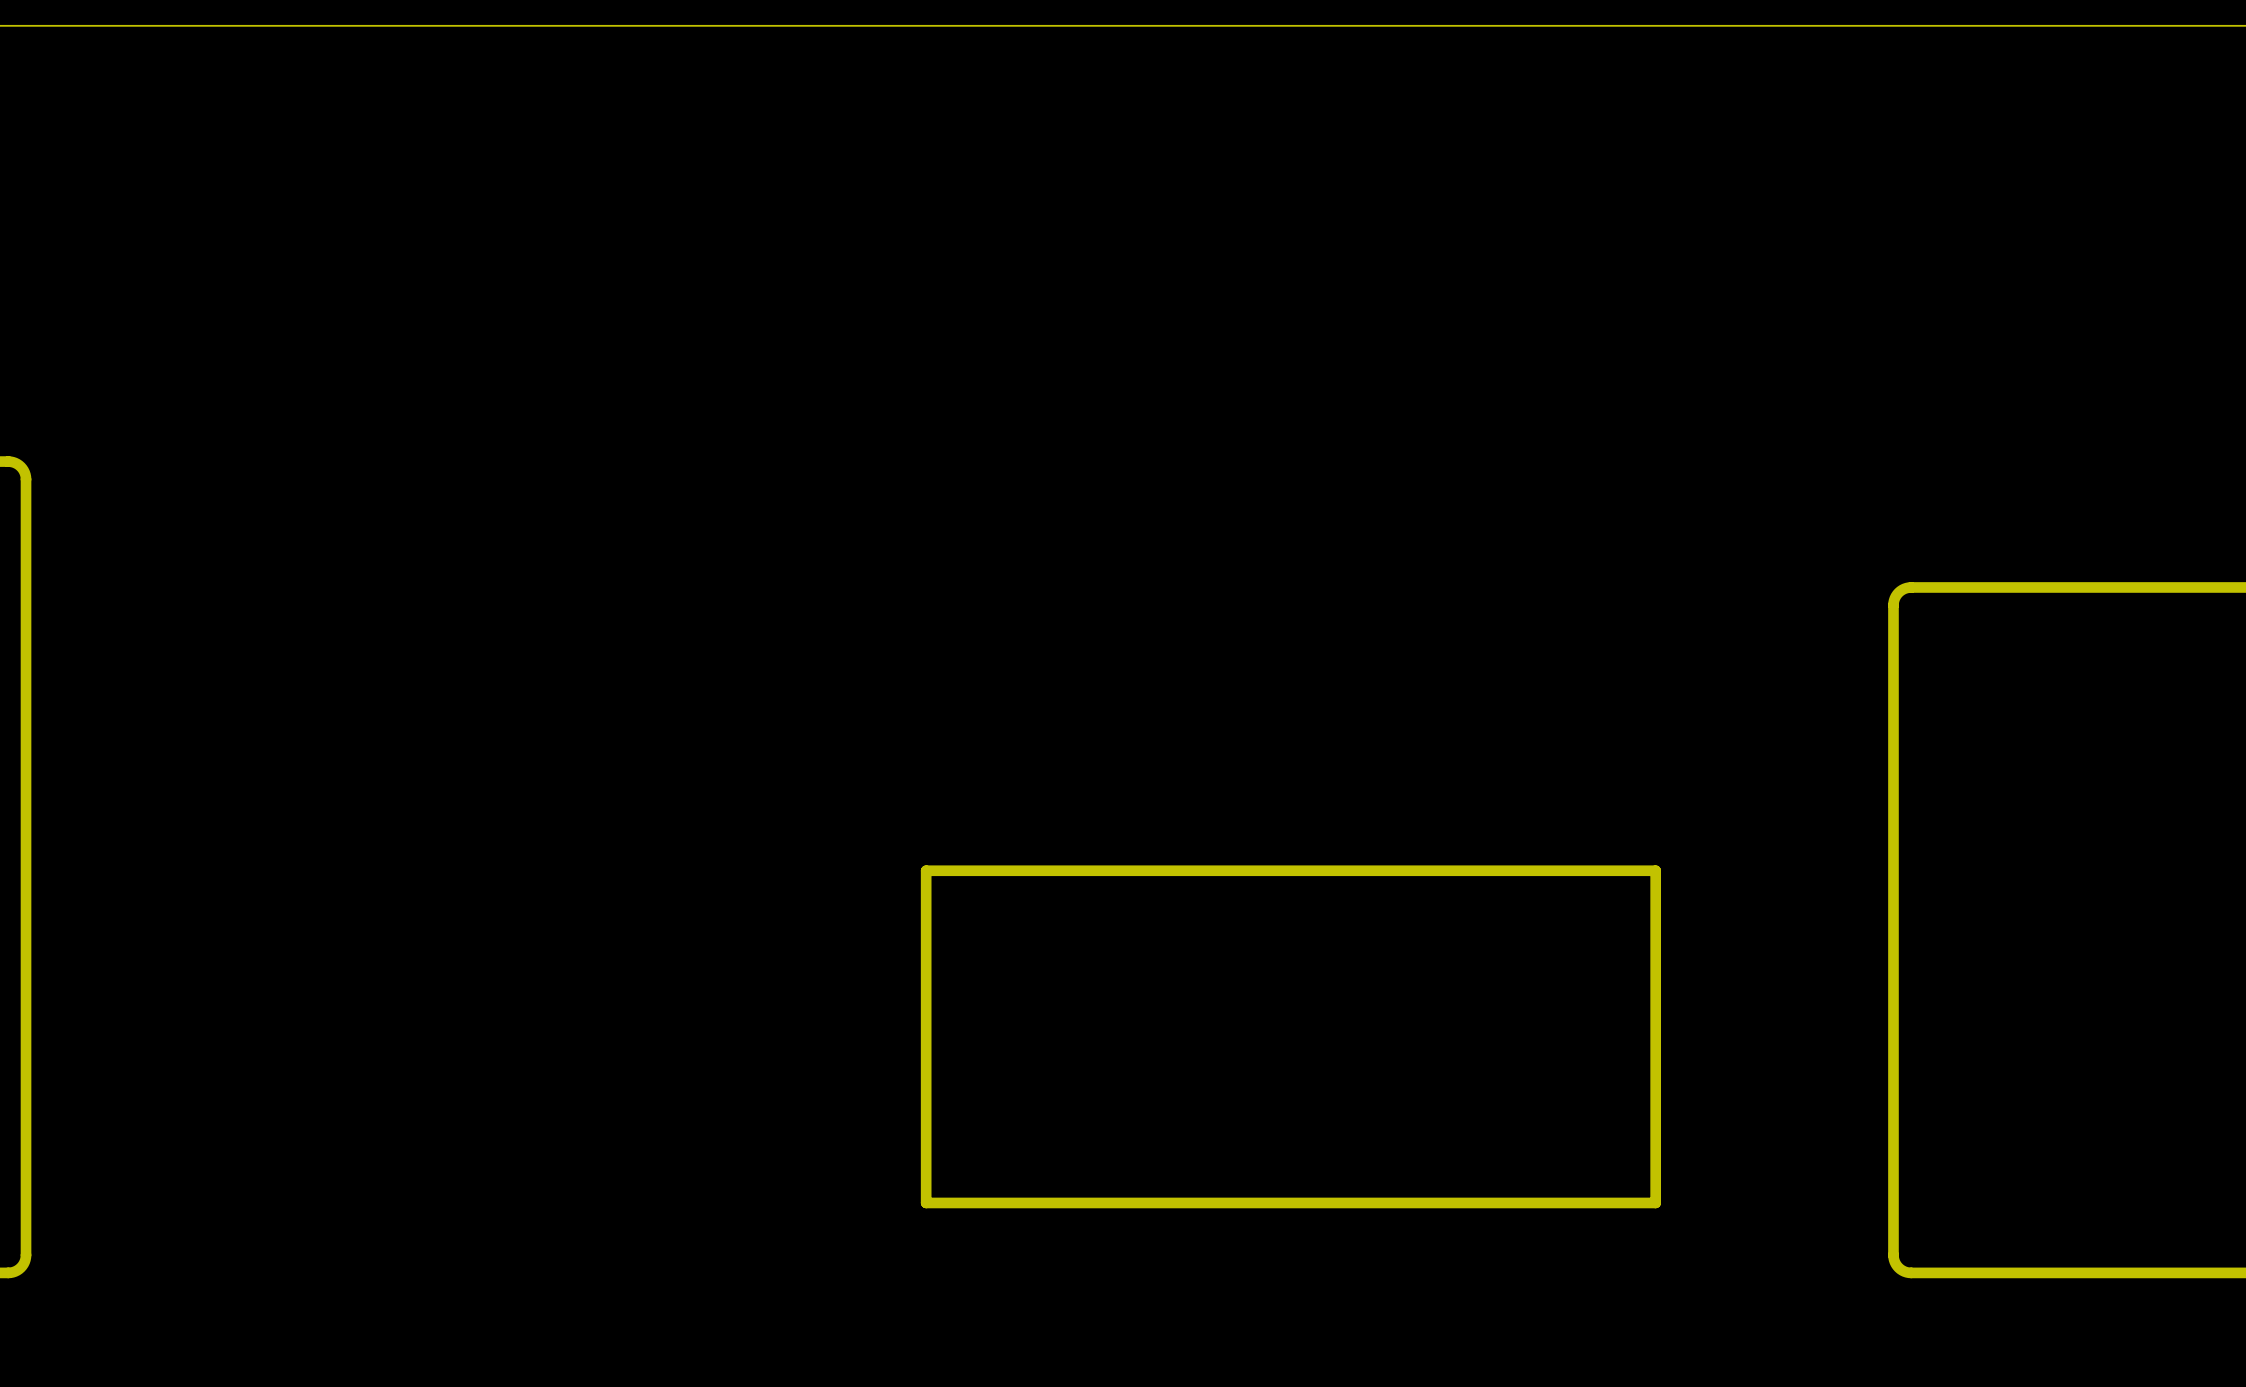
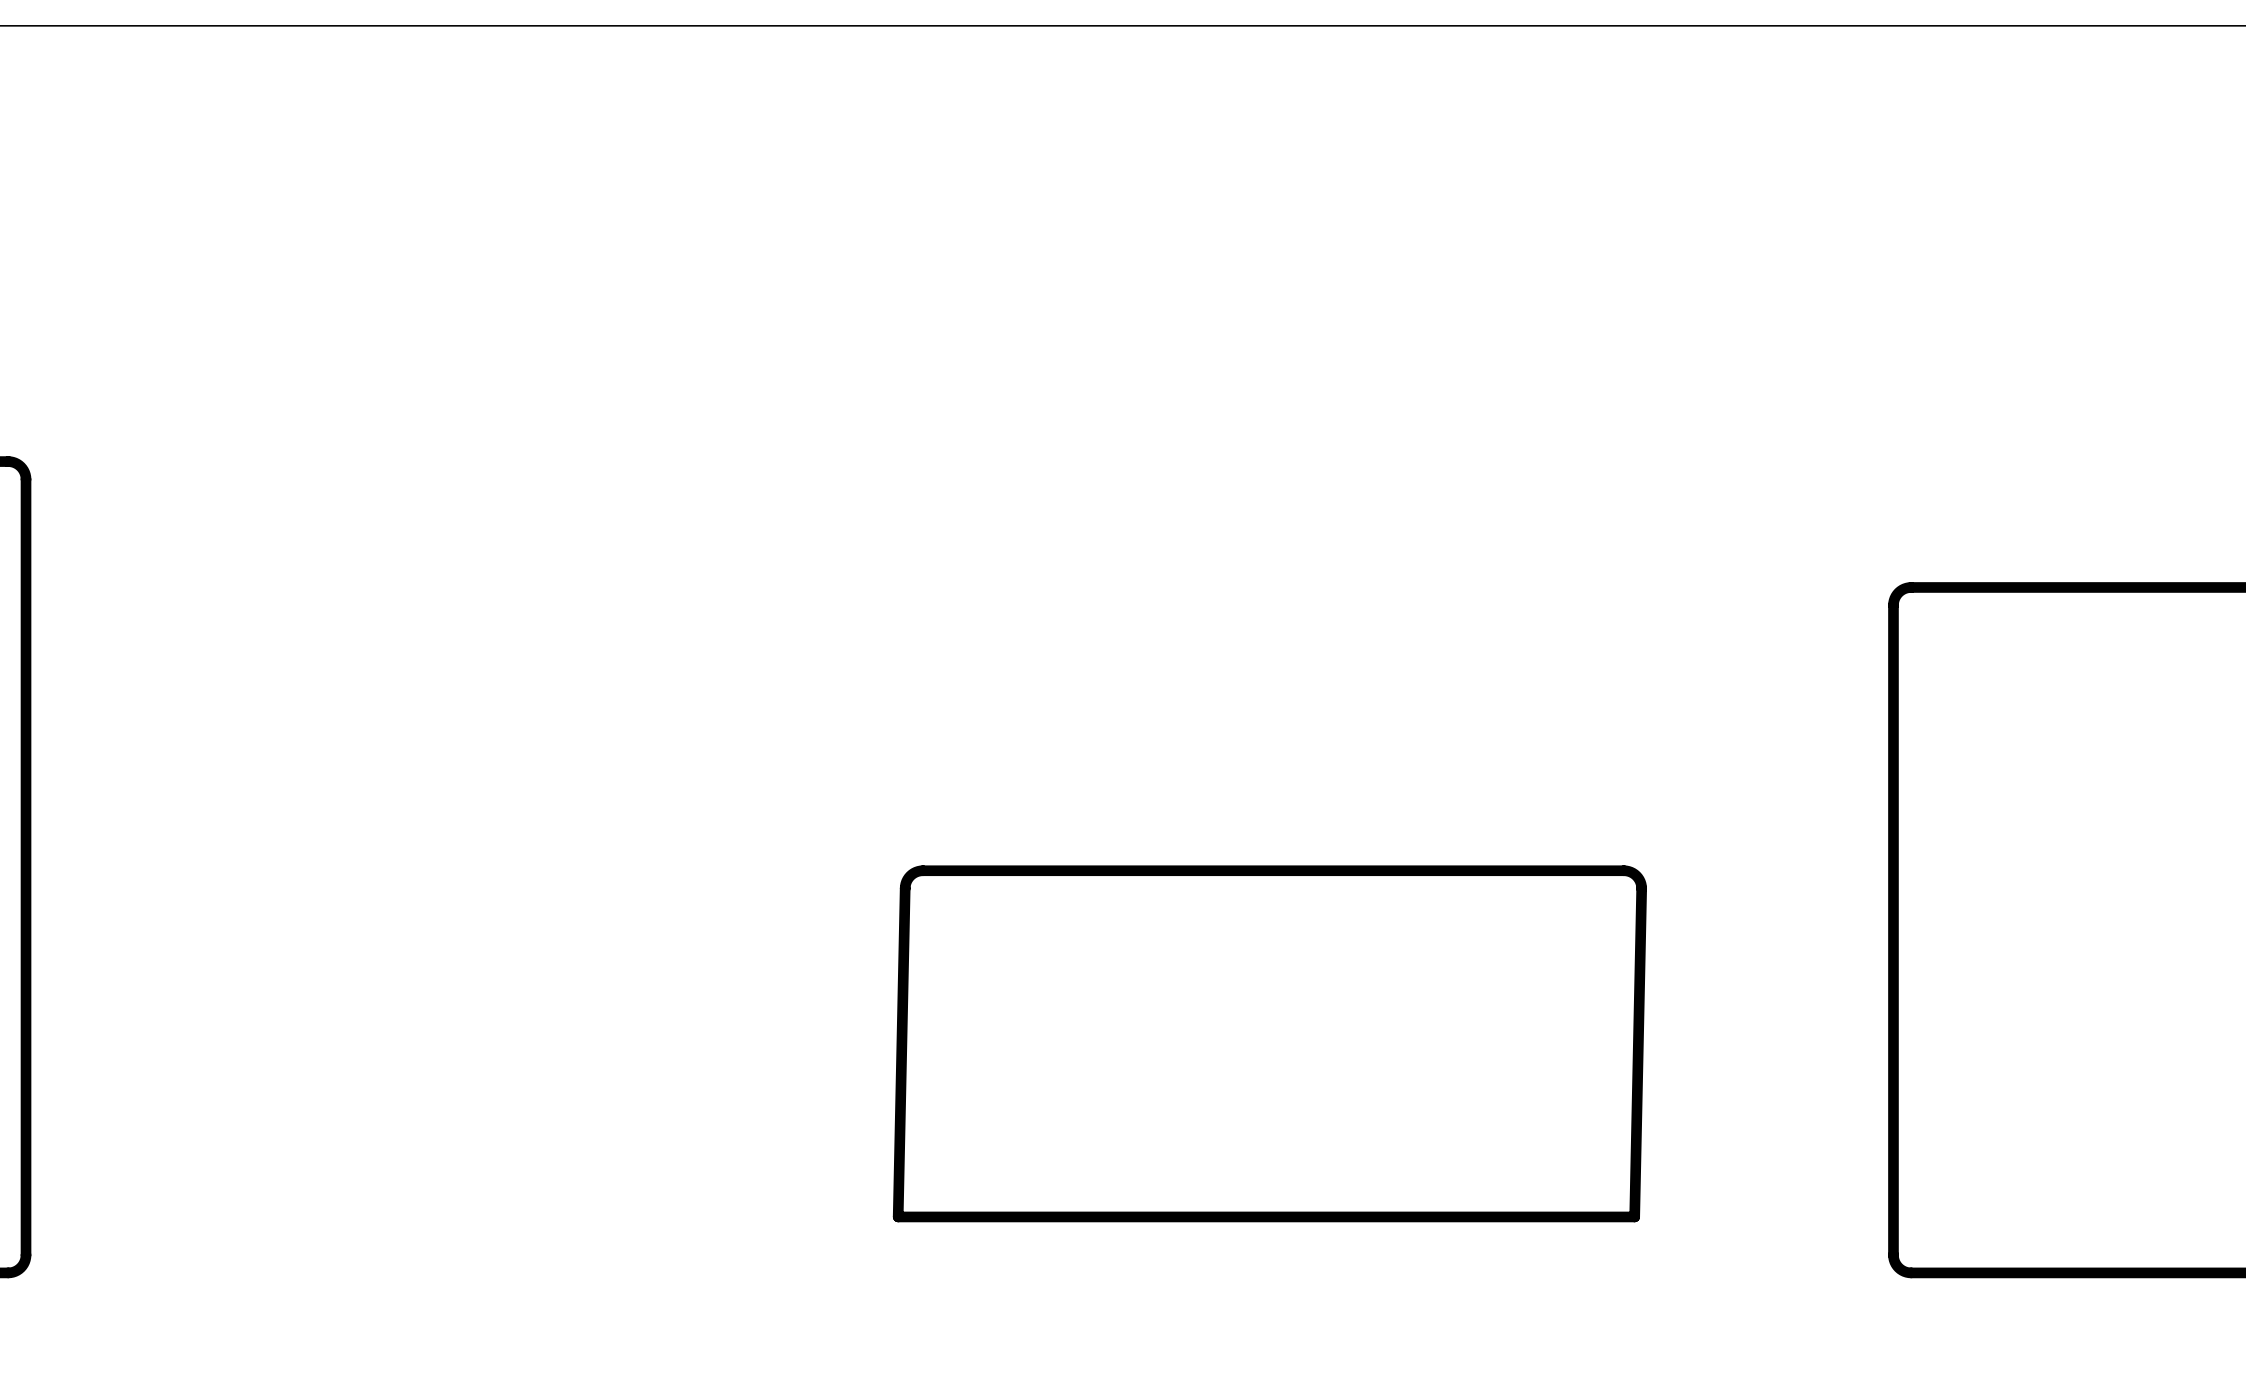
board edge: (1623, 870) (1655, 870) (1655, 1202) (926, 1202) (926, 870) -> (1623, 870) (1636, 875) (1641, 888) (1634, 1216) (898, 1216) (905, 886) (912, 874) (926, 870)

